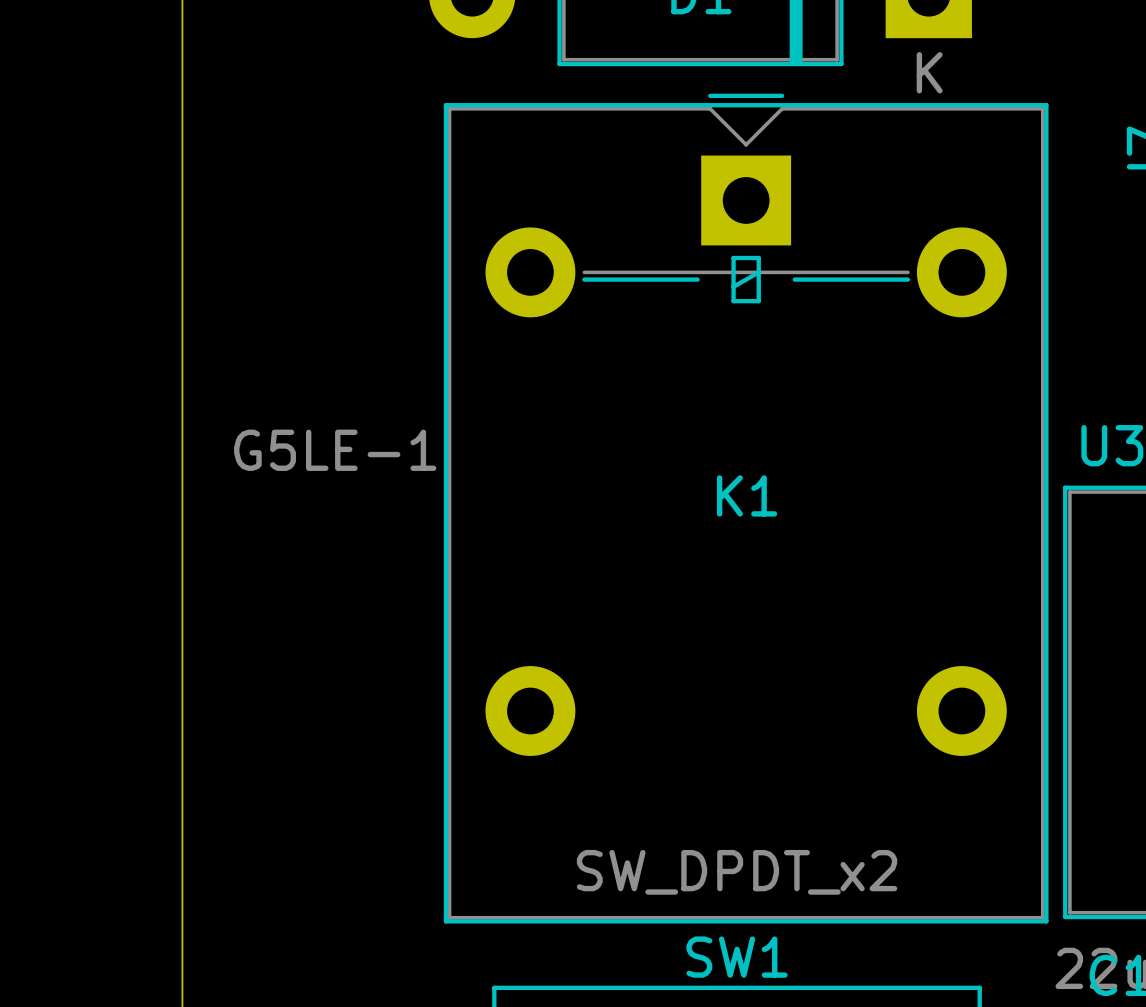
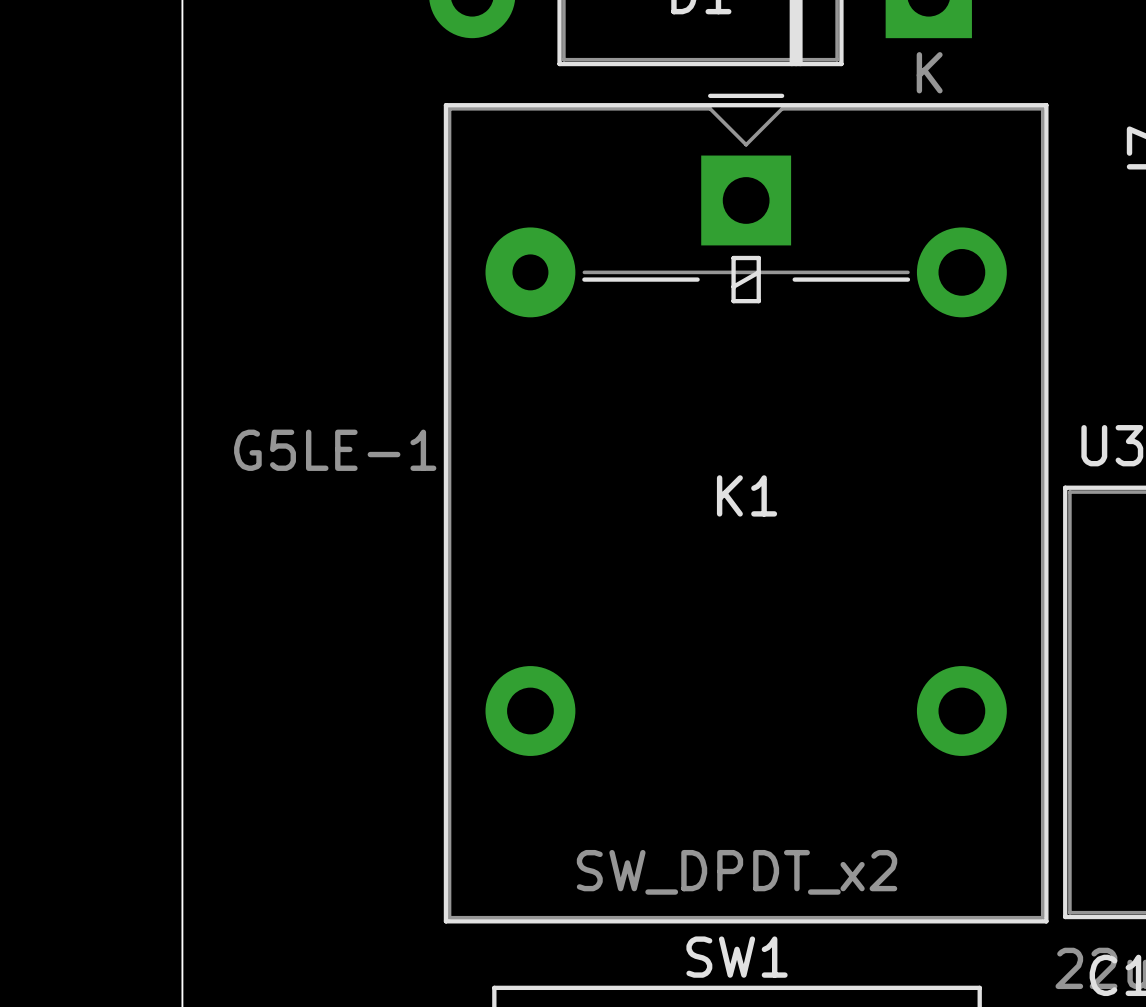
K1 footprint: [443, 93, 1049, 924] -> [443, 93, 1049, 924]

